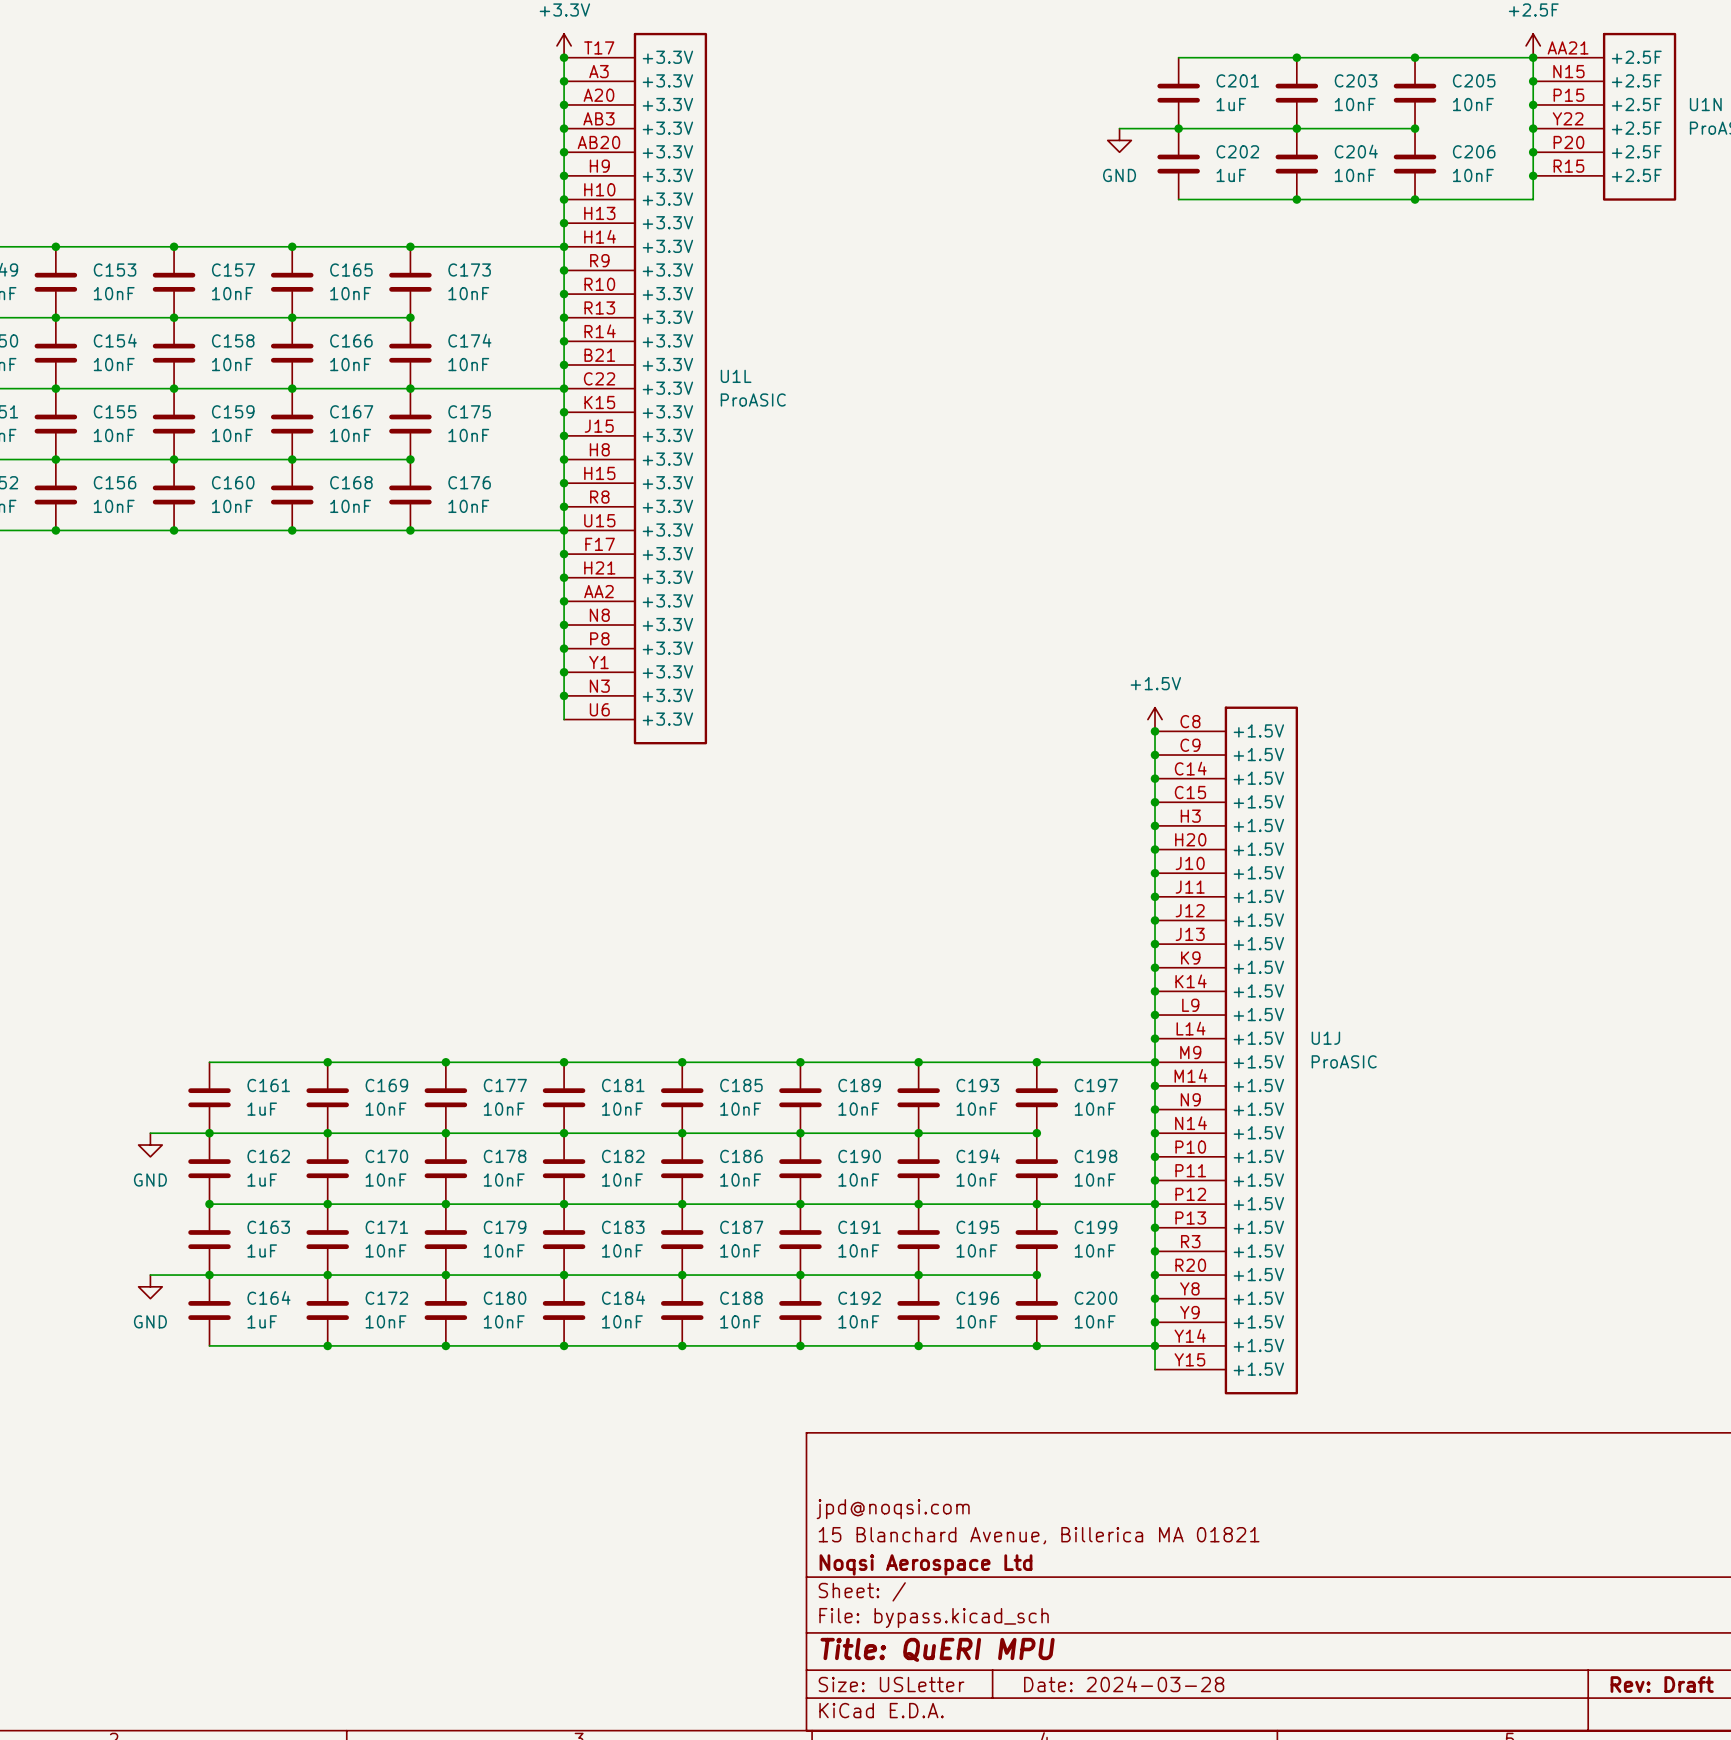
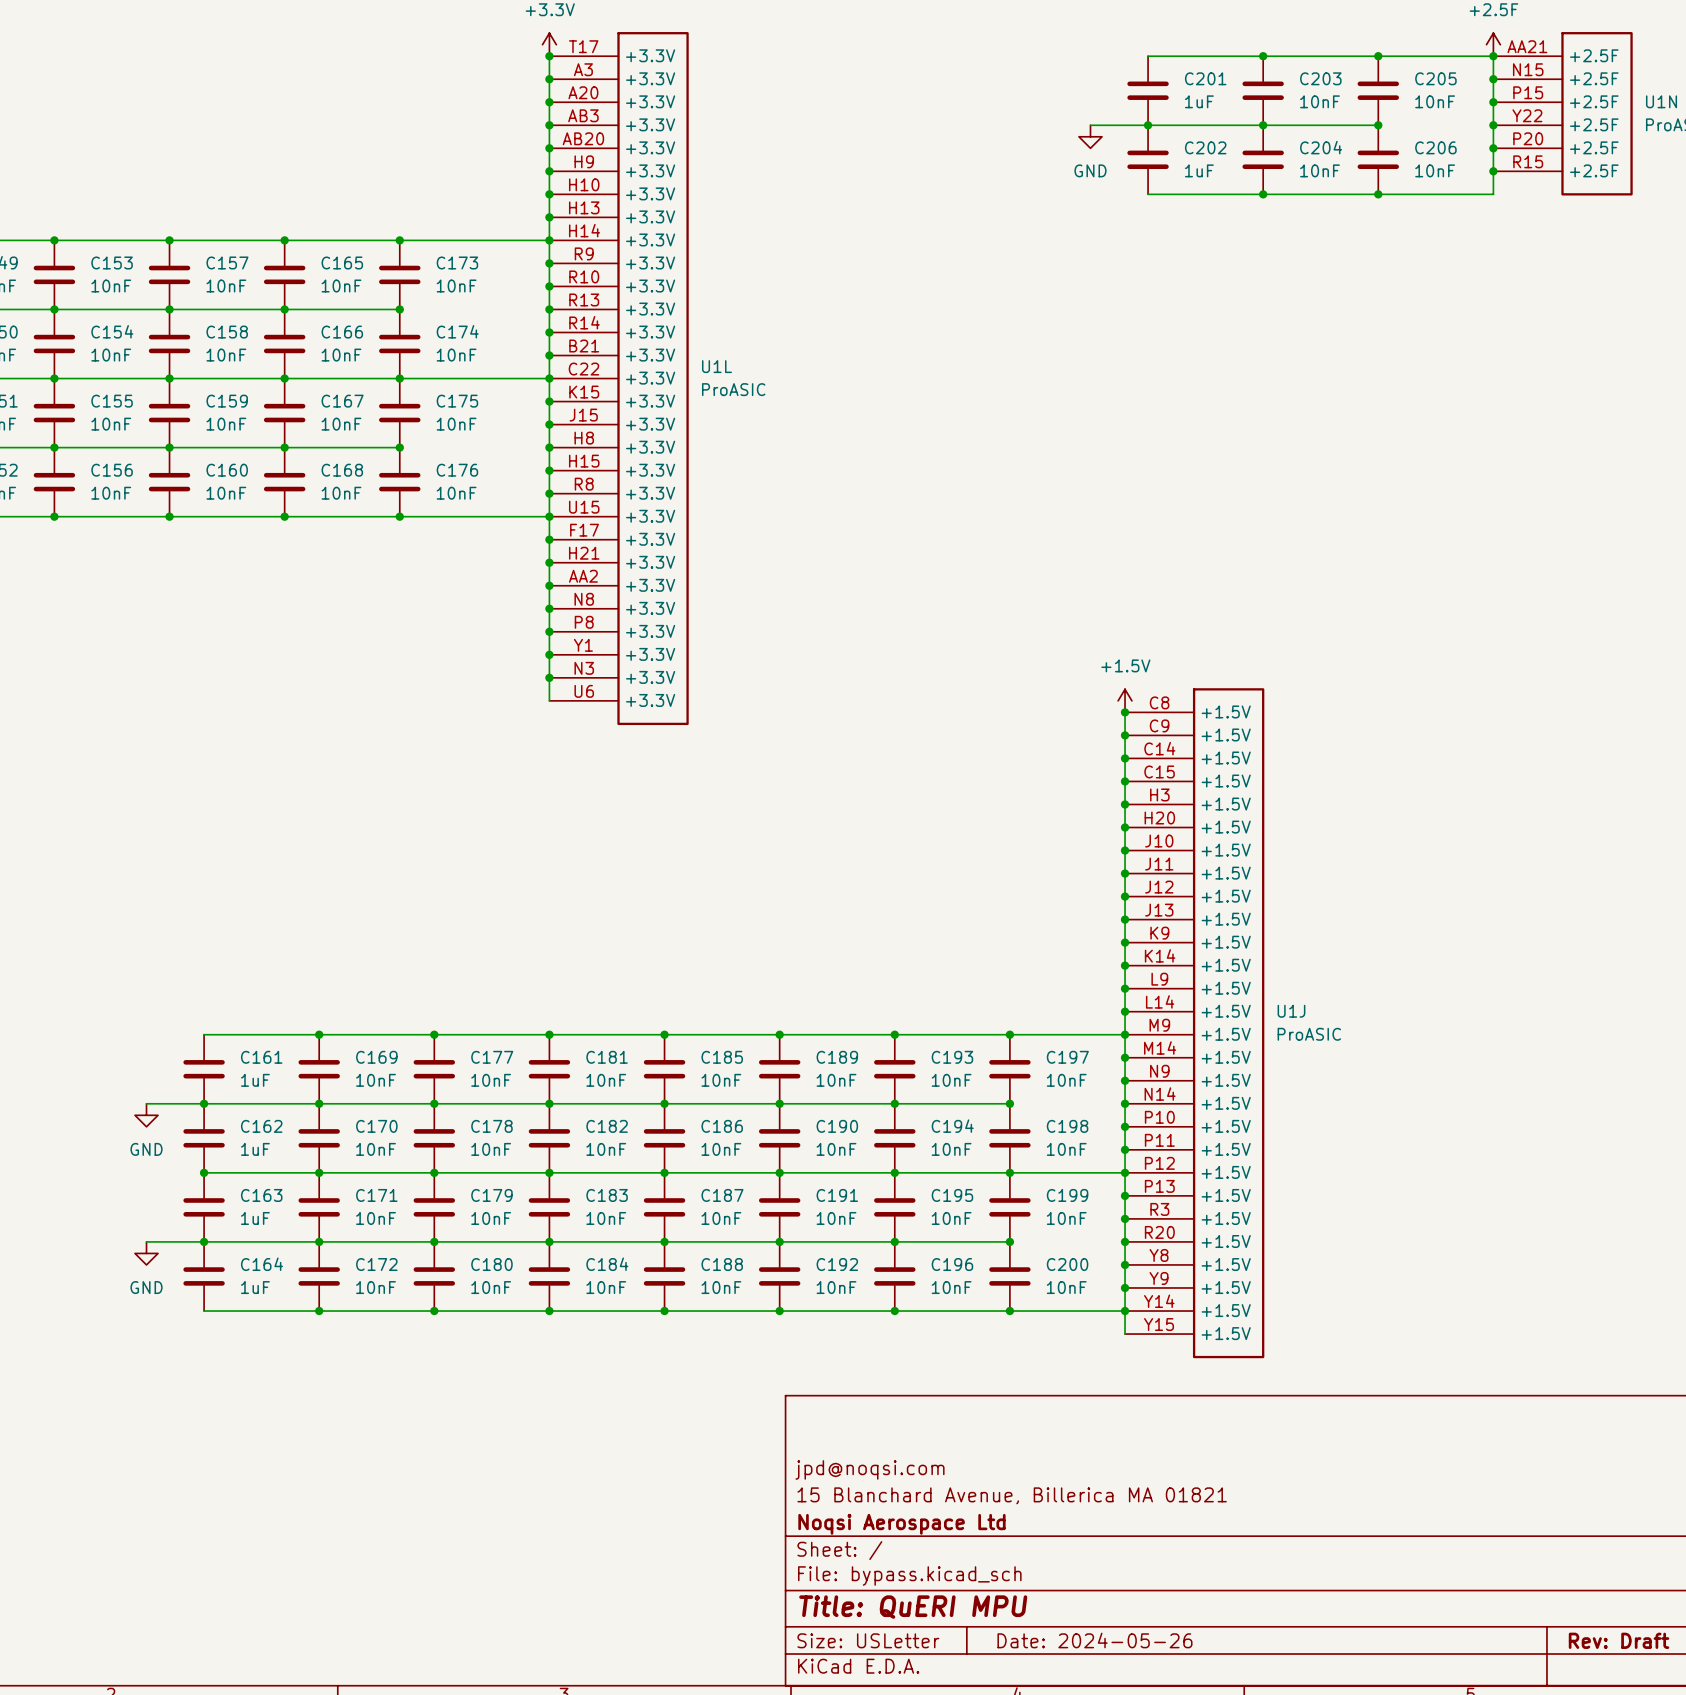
title block: Date: 2024-03-28 (1124, 1684) -> Date: 2024-05-26 (1094, 1640)

